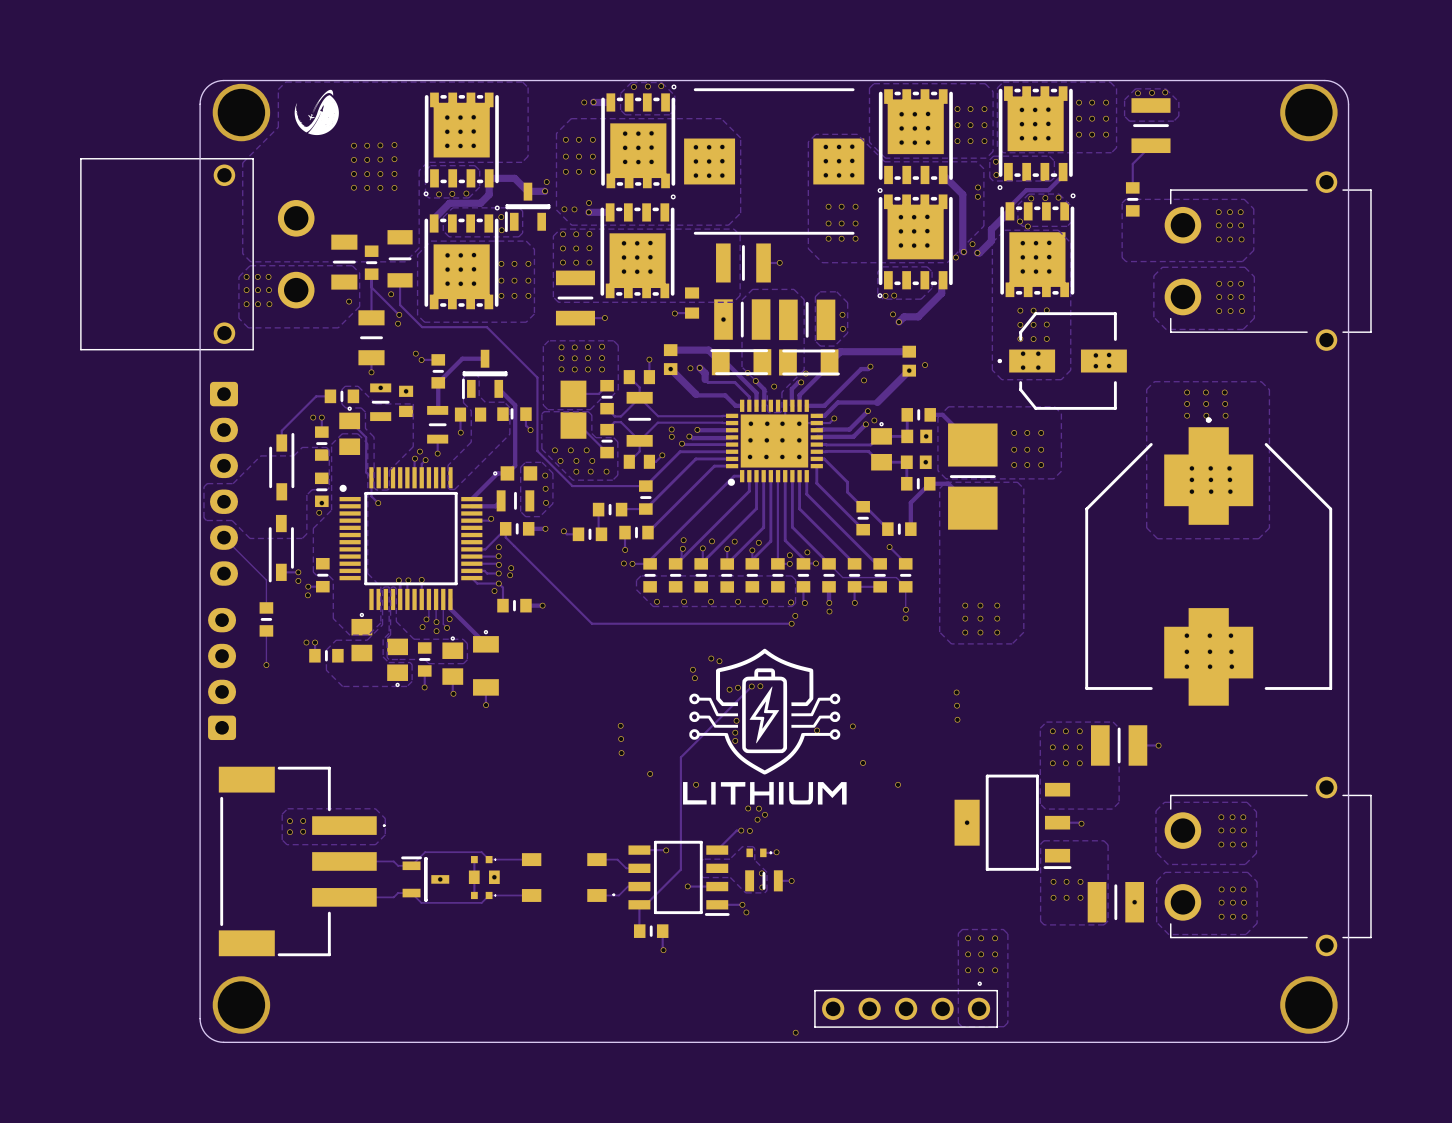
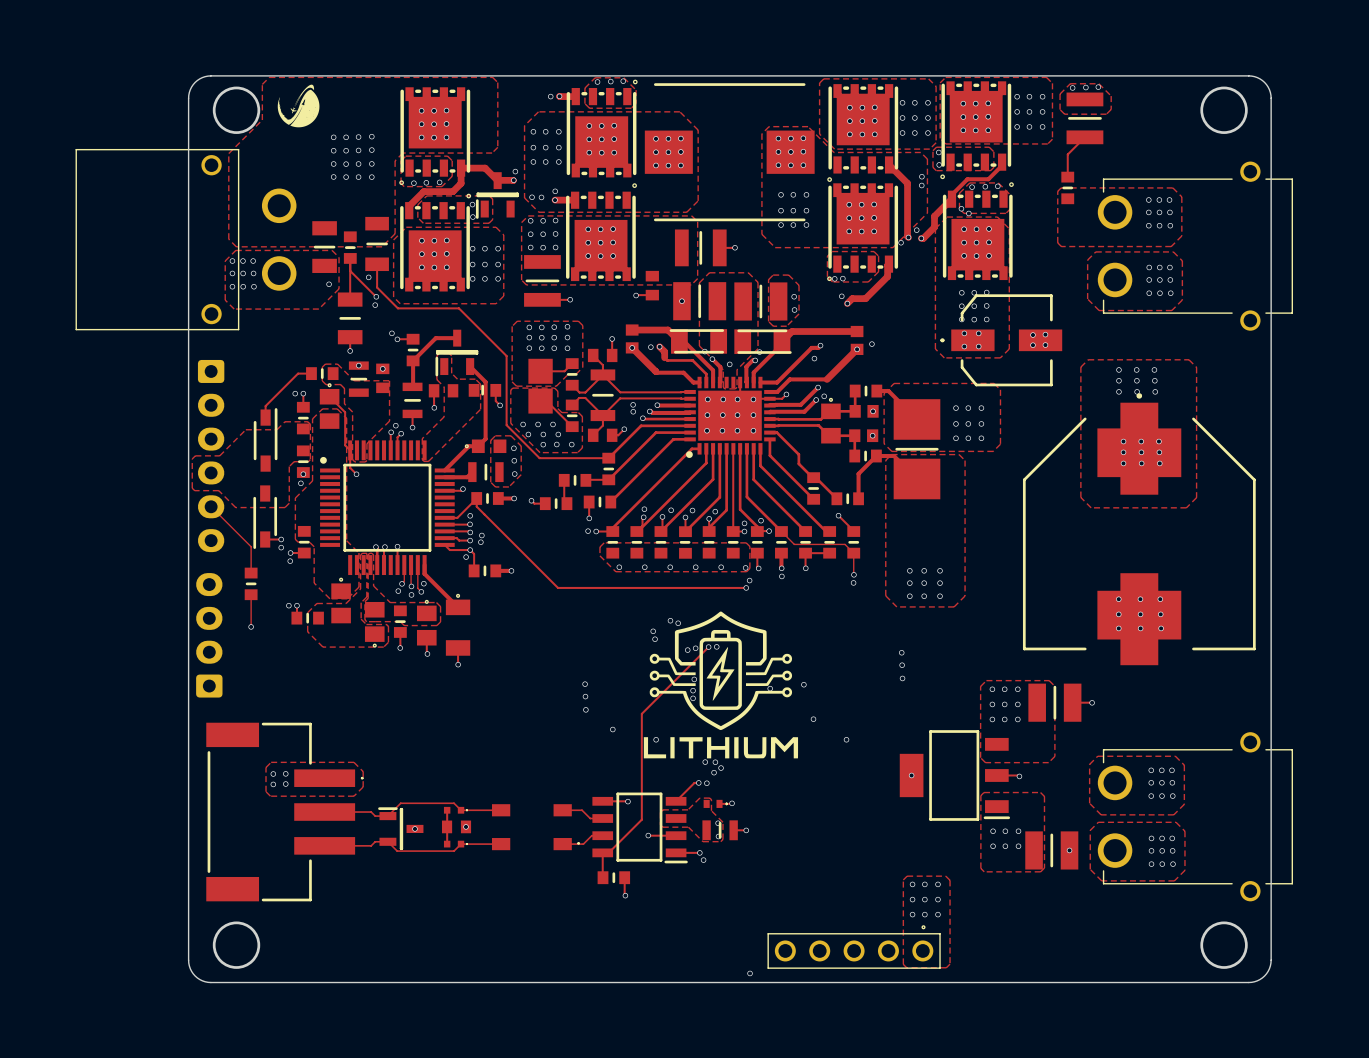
round board edge: none -> [212, 86, 261, 134]
round board edge: none -> [1200, 86, 1248, 134]
via: (241, 112) -> none
via: (1308, 112) -> none
round board edge: none -> [212, 921, 261, 969]
round board edge: none -> [1200, 921, 1248, 969]
via: (241, 1005) -> none
via: (1308, 1005) -> none

